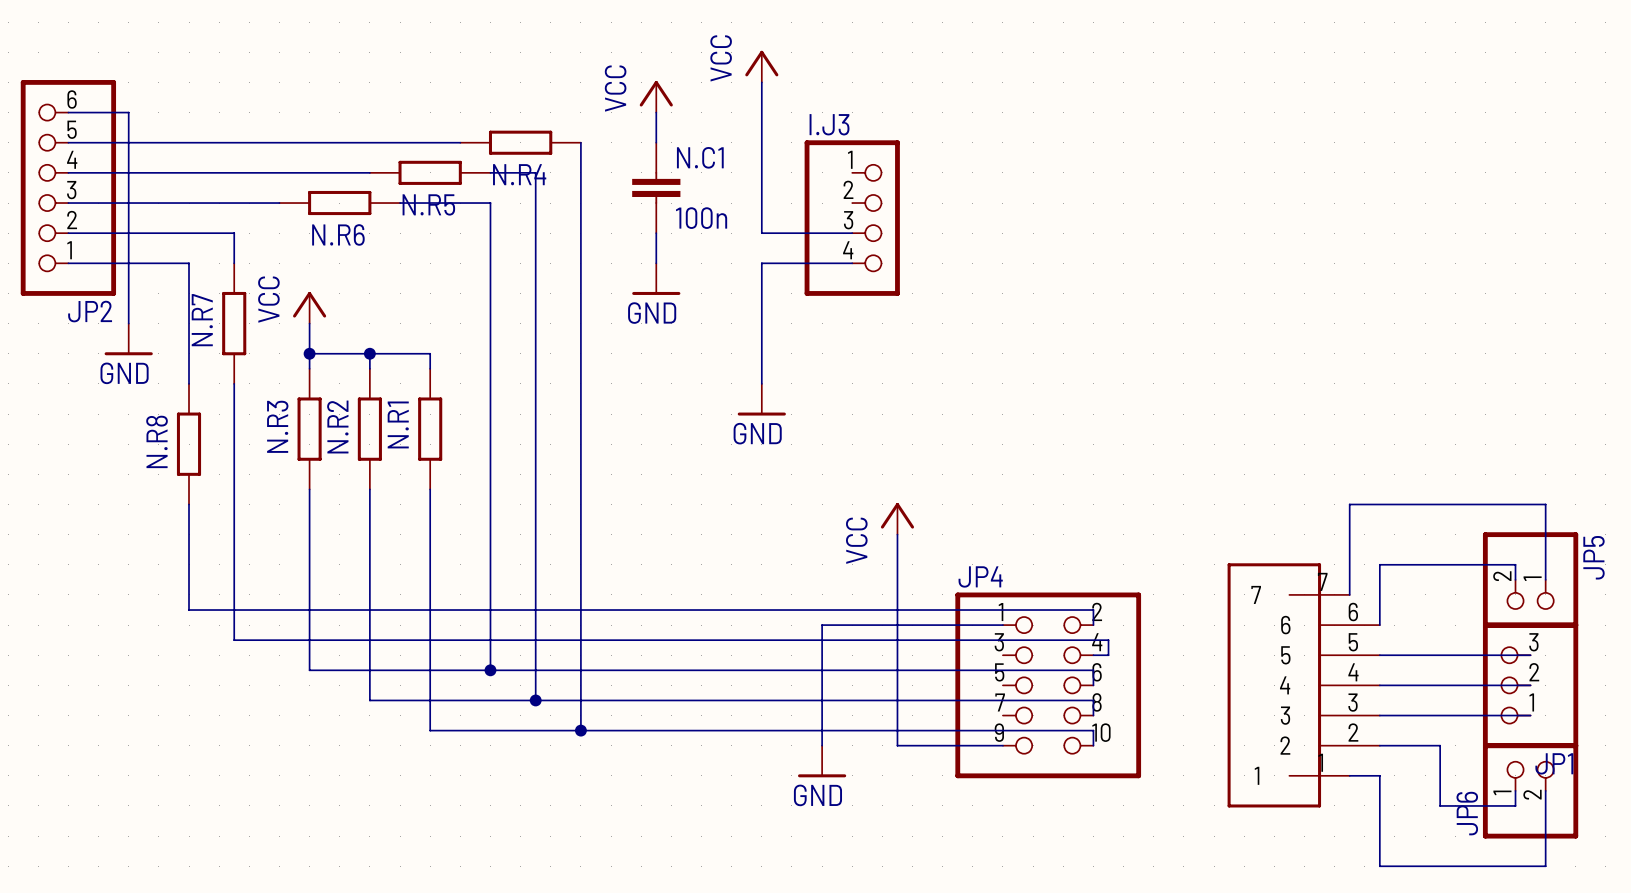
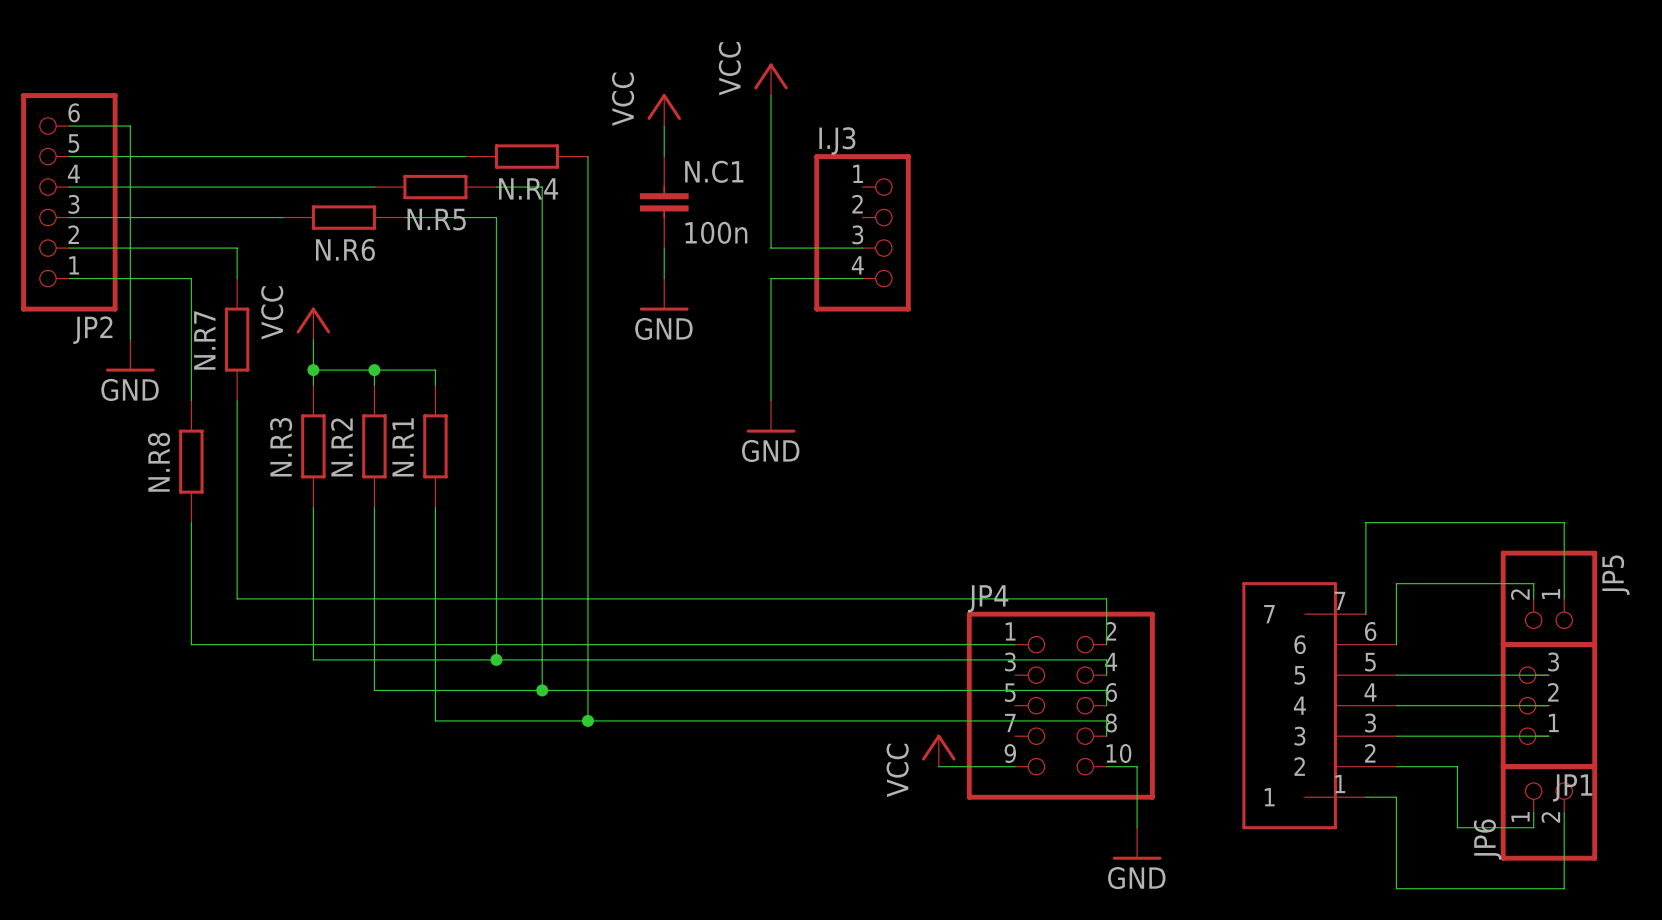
power symbol position: VCC (897, 518) -> VCC (938, 750)
wire: (897, 534) (897, 745) (927, 745) -> none
wire: (234, 579) (234, 640) (309, 640) (309, 670) (369, 670) (369, 700) (430, 700) (430, 730) (1093, 730) (1093, 745) -> (1137, 827) (1137, 766) (1106, 766)
wire: (189, 610) (1093, 610) -> (237, 598) (1106, 598) (1106, 629)
wire: (822, 625) (822, 745) -> (832, 644) (191, 644) (191, 629)
wire: (490, 640) (490, 670) -> none
junction: none -> (496, 659)
wire: (1093, 640) (1108, 640) (1108, 655) (1093, 655) -> (1106, 659) (1106, 675)
junction: (490, 670) -> none
wire: (535, 670) (535, 700) -> none
junction: none -> (542, 690)
junction: (535, 700) -> none
wire: (580, 700) (580, 730) -> none
junction: none -> (587, 720)
junction: (580, 730) -> none
power symbol: GND (822, 761) -> none
power symbol: none -> GND (1137, 843)

